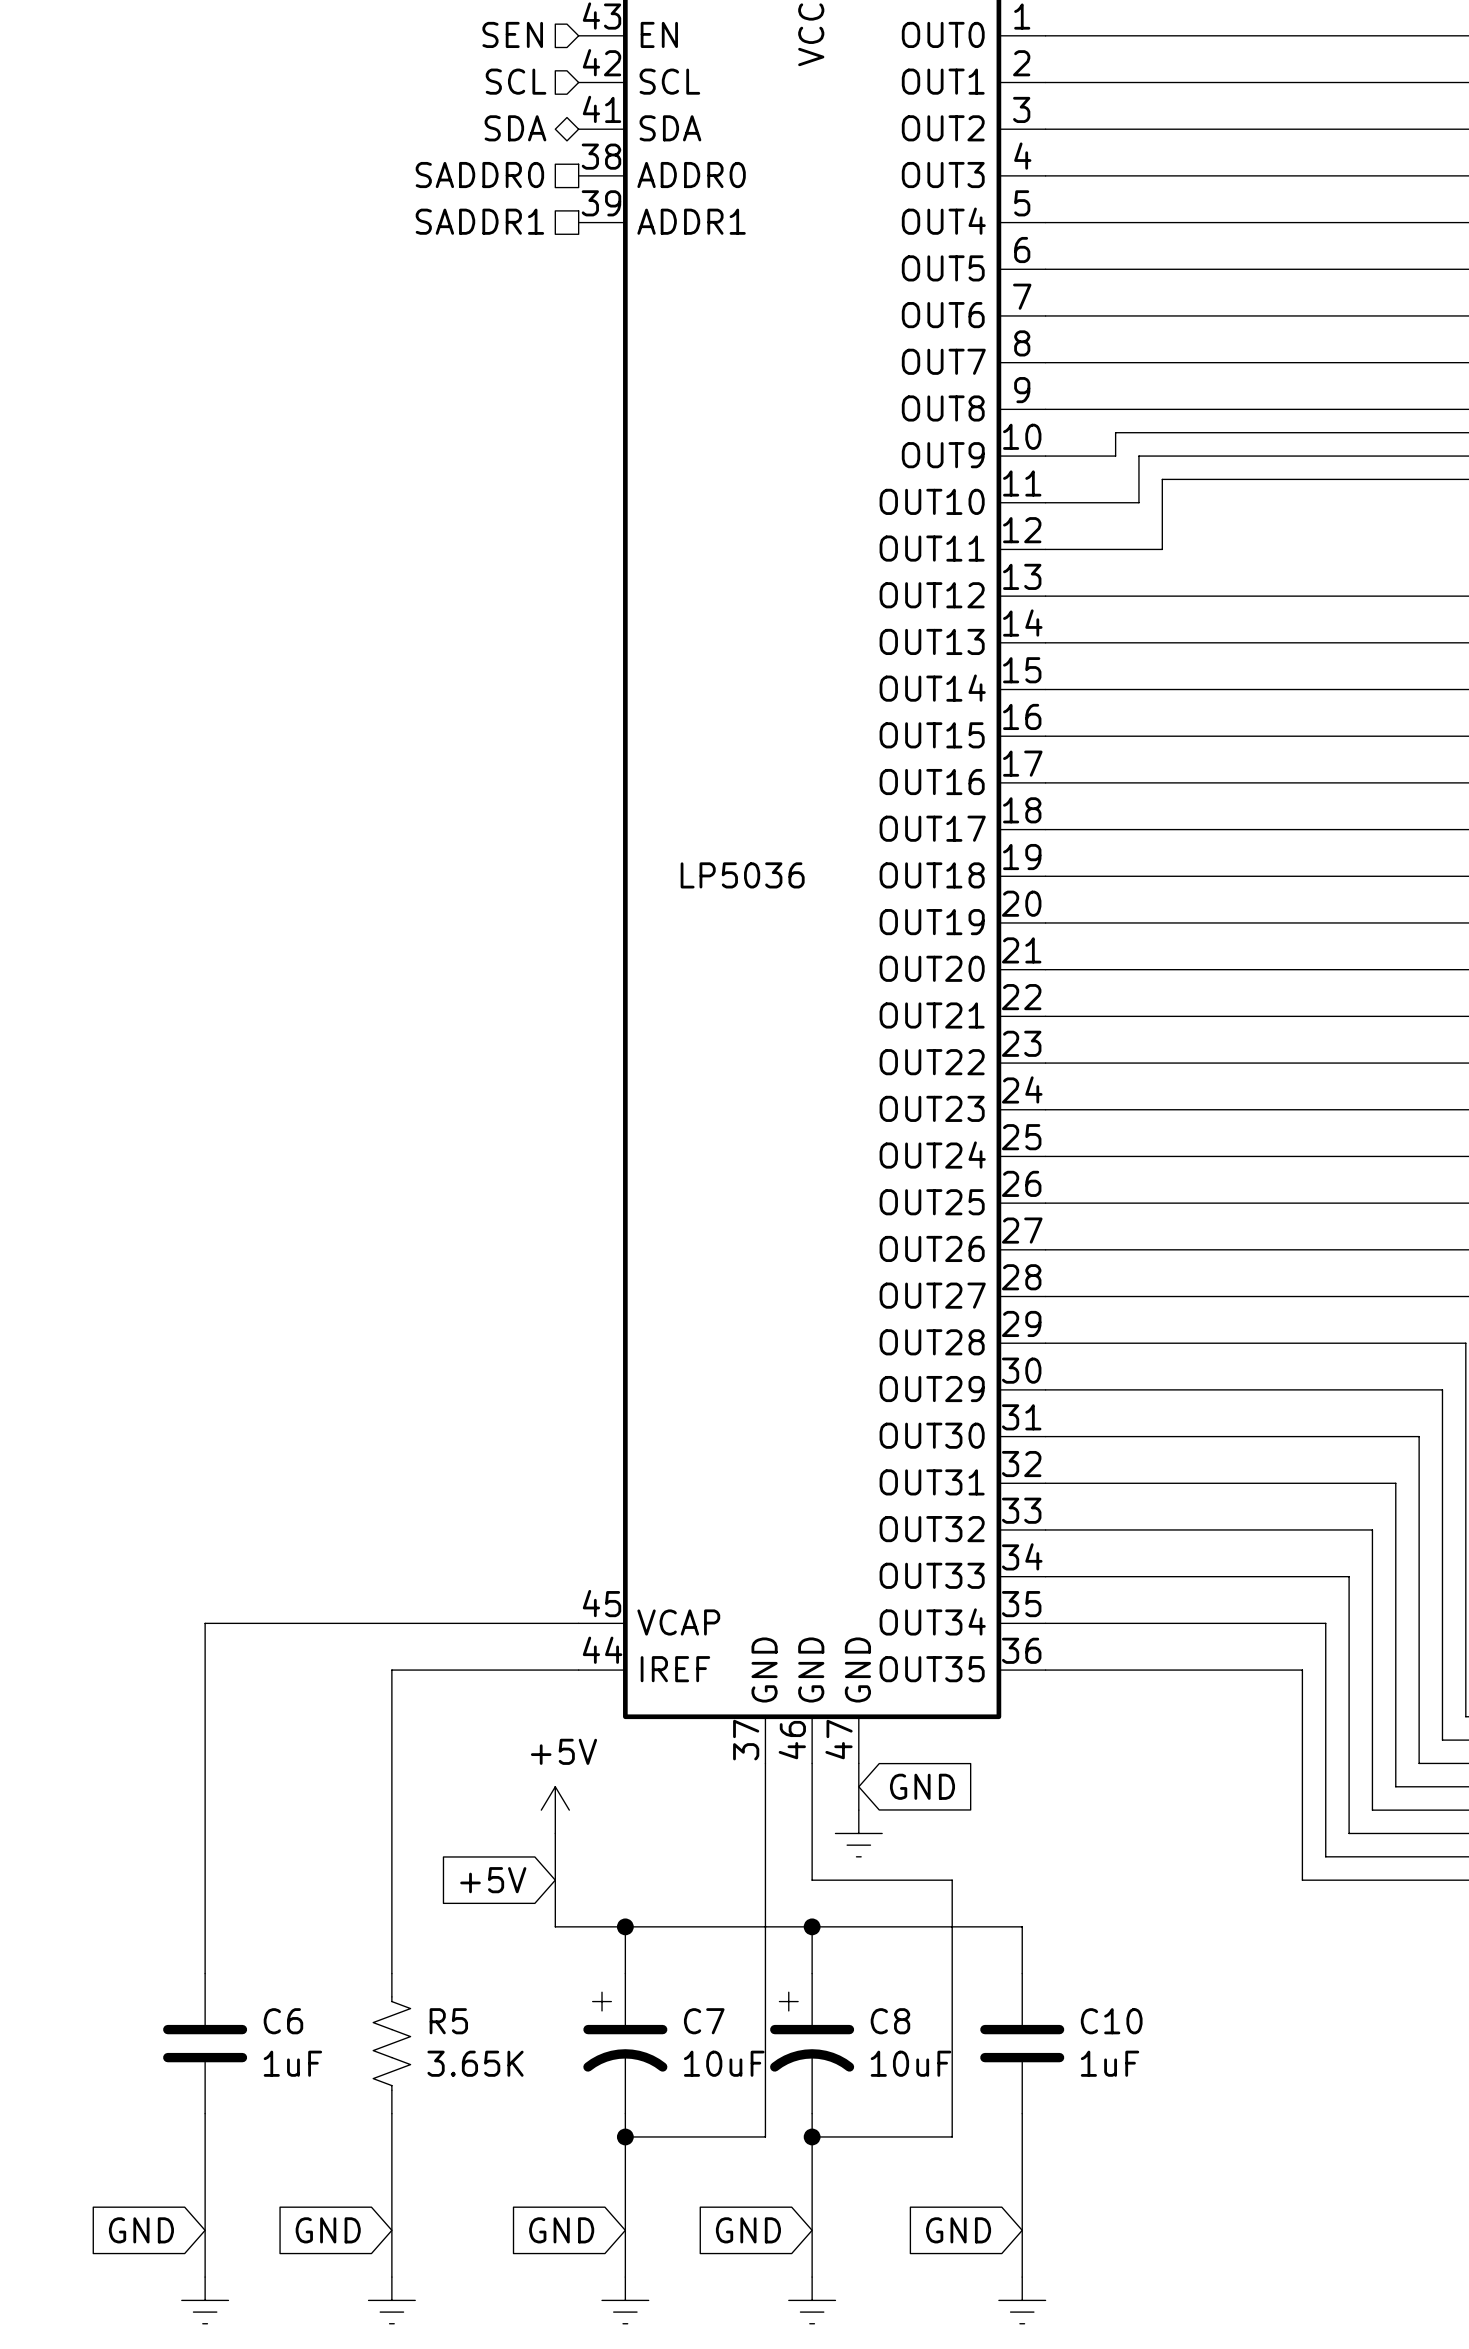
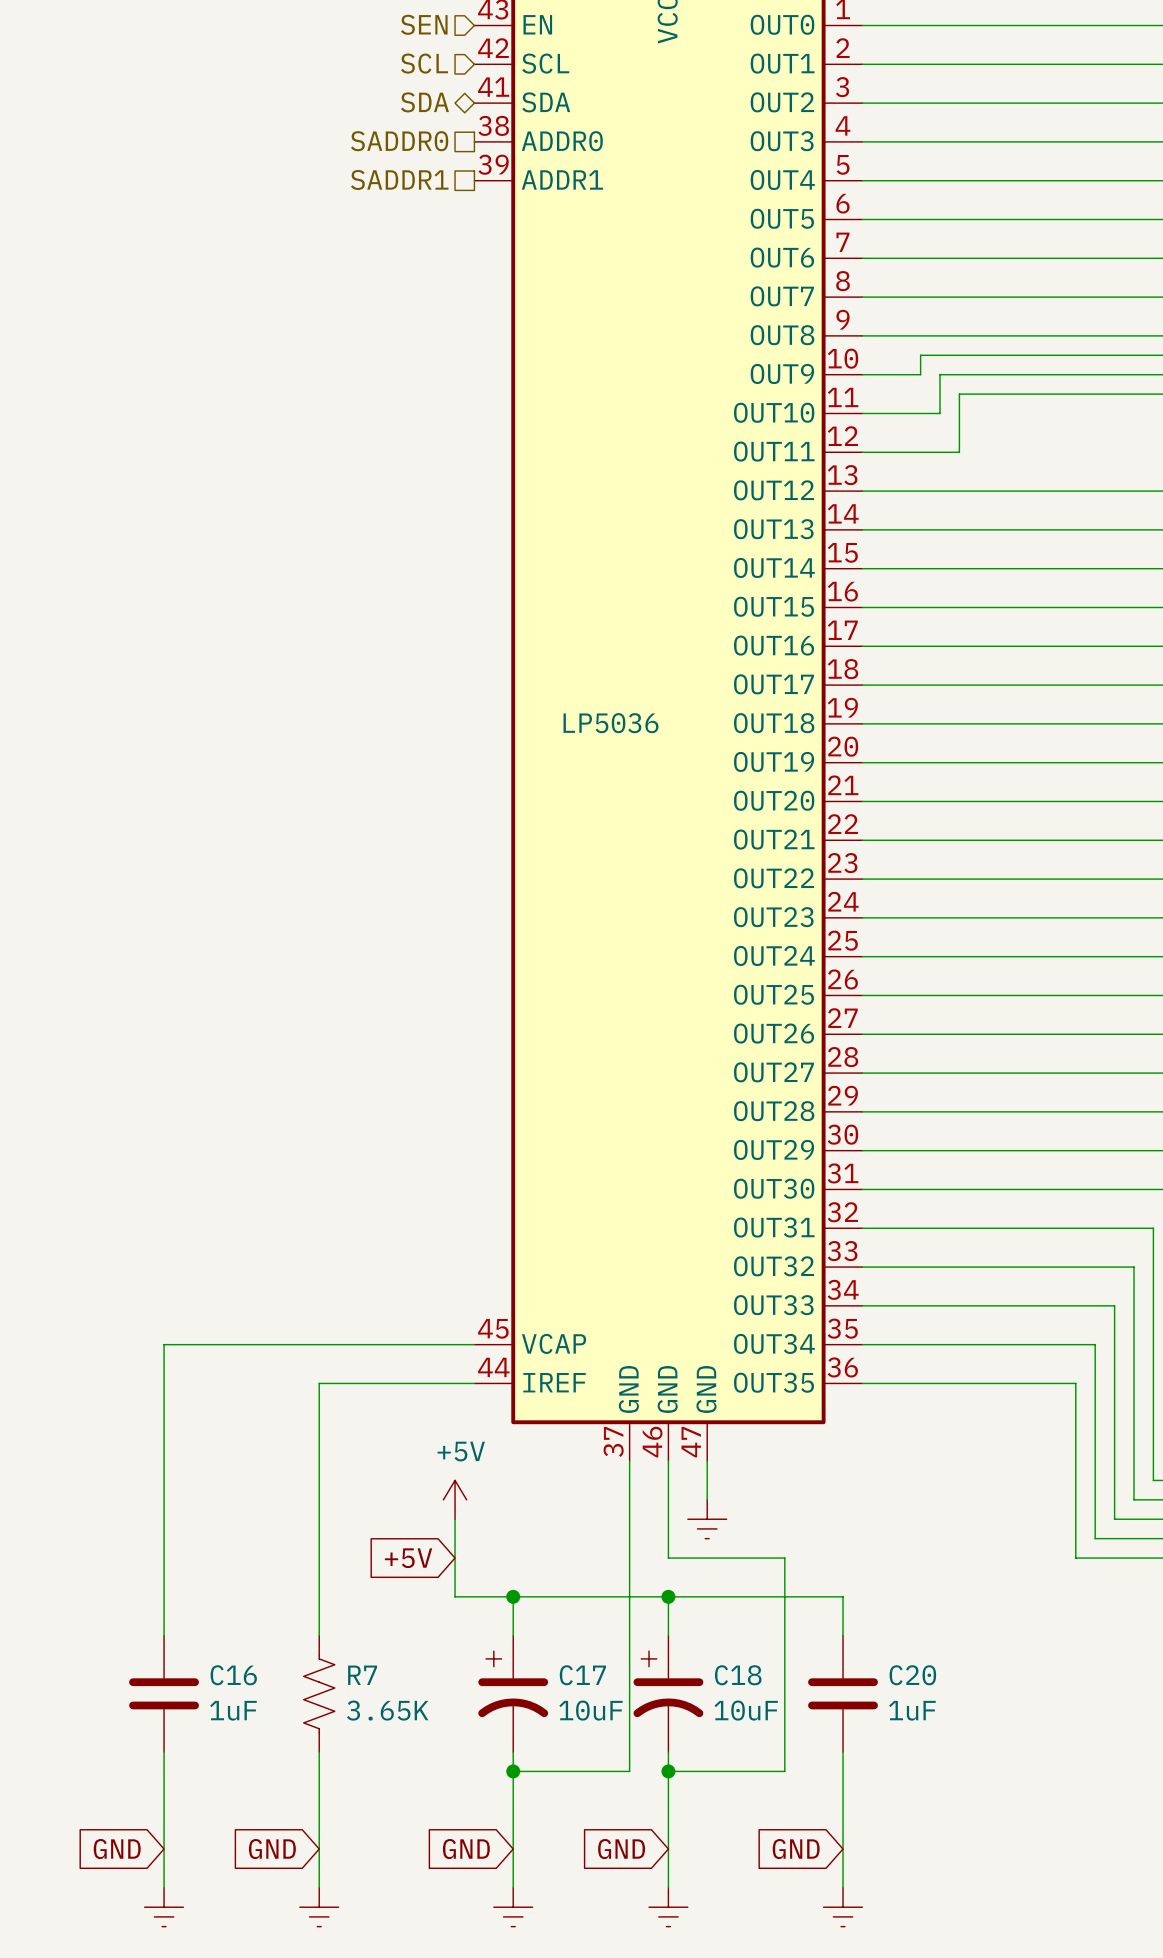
global label: GND (922, 1786) -> none
C6 name: C6 (283, 2021) -> C16 (233, 1675)
R5 name: R5 (448, 2021) -> R7 (362, 1675)
C7 name: C7 (704, 2021) -> C17 (582, 1675)
C8 name: C8 (890, 2021) -> C18 (738, 1675)
C10 name: C10 (1111, 2021) -> C20 (912, 1675)

